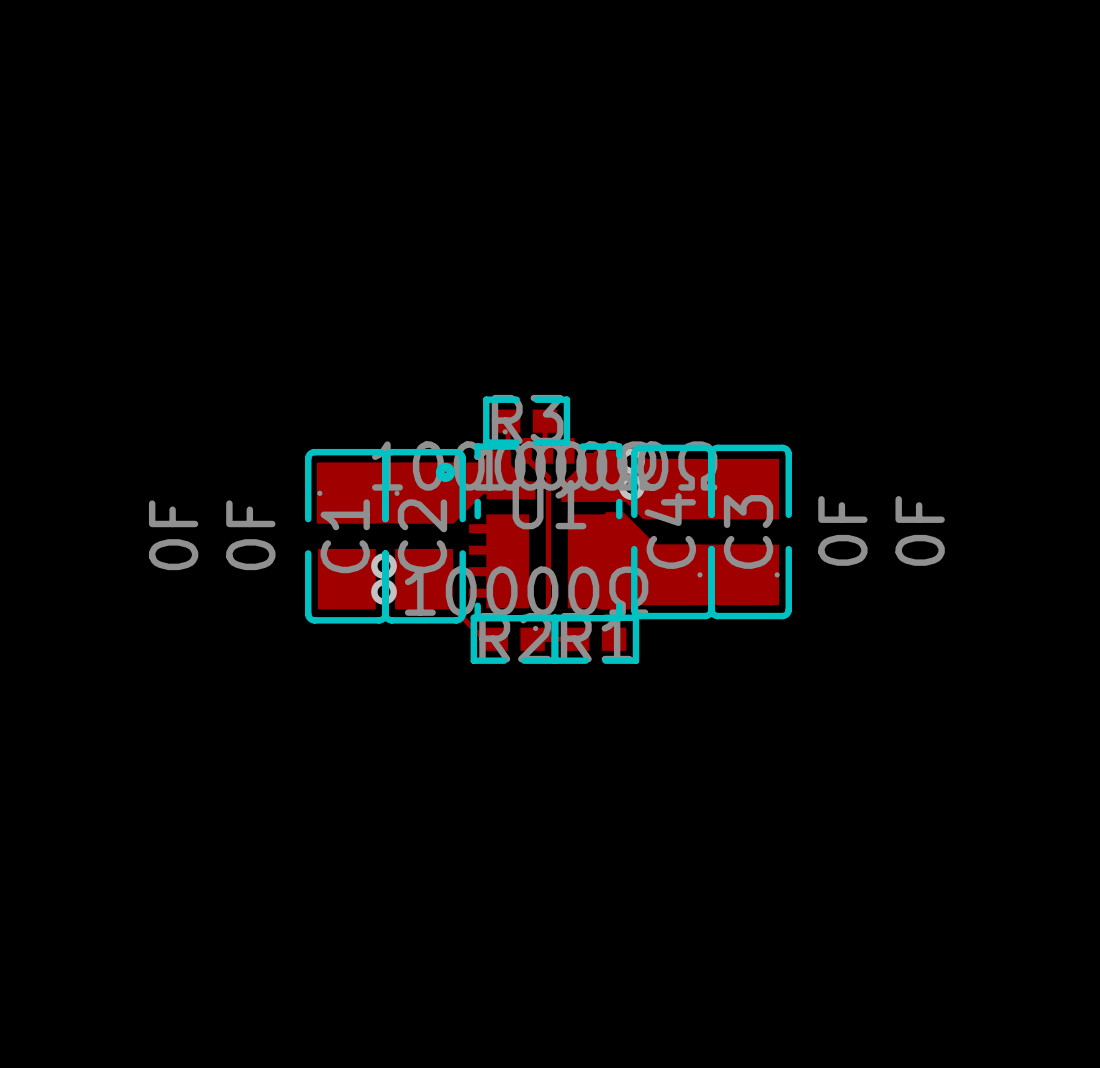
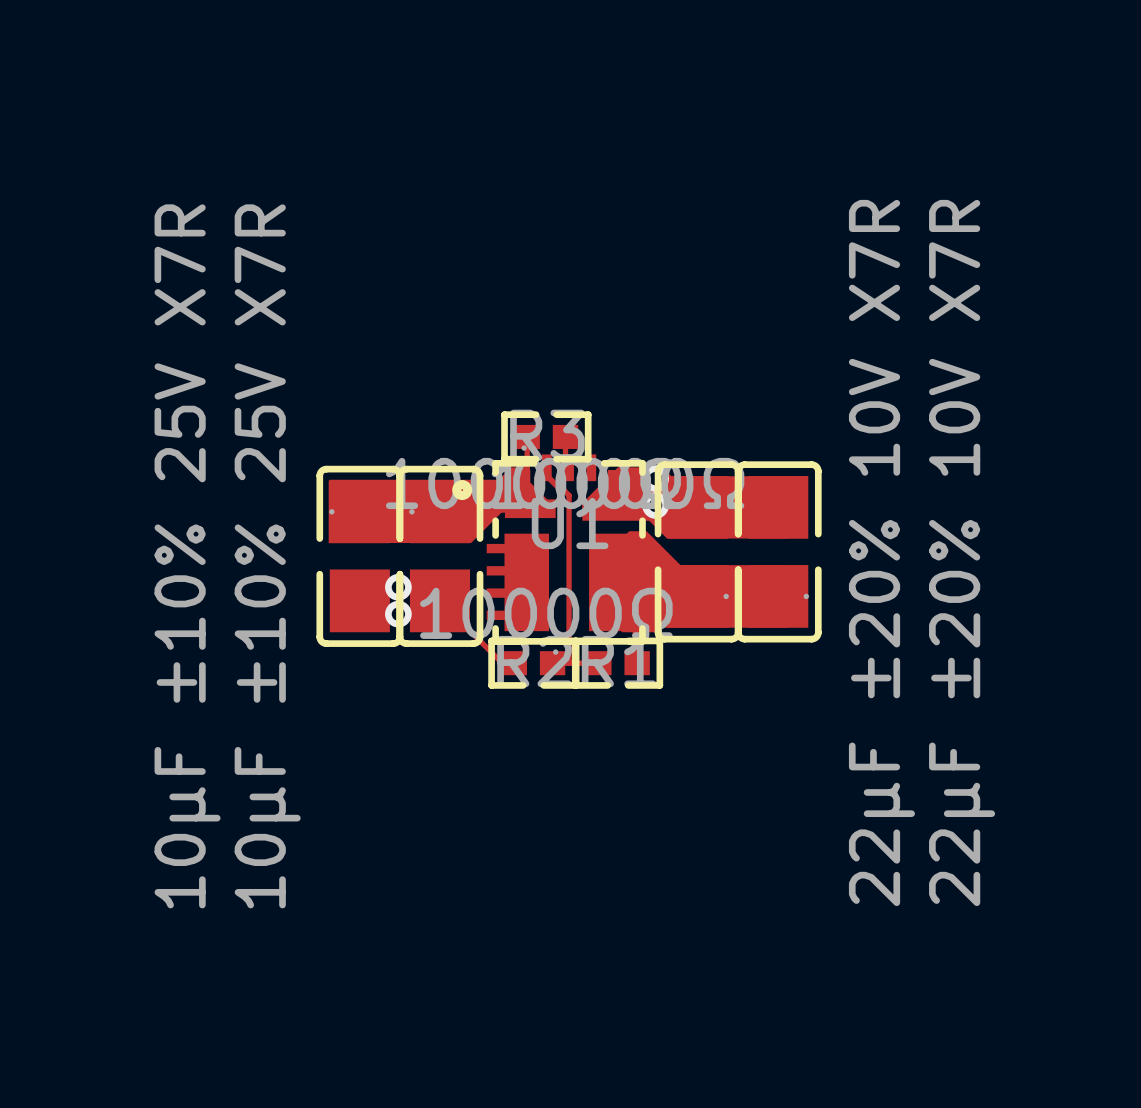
C4 name: C4 (670, 530) -> none
C4 value: 0F (842, 530) -> 22µF ±20% 10V X7R (881, 552)
C3 value: 0F (920, 530) -> 22µF ±20% 10V X7R (962, 552)
C3 name: C3 (748, 531) -> none
C1 value: 0F (173, 535) -> 10µF ±10% 25V X7R (187, 556)
C2 value: 0F (250, 535) -> 10µF ±10% 25V X7R (267, 556)
C1 name: C1 (345, 536) -> none
C2 name: C2 (422, 536) -> none

